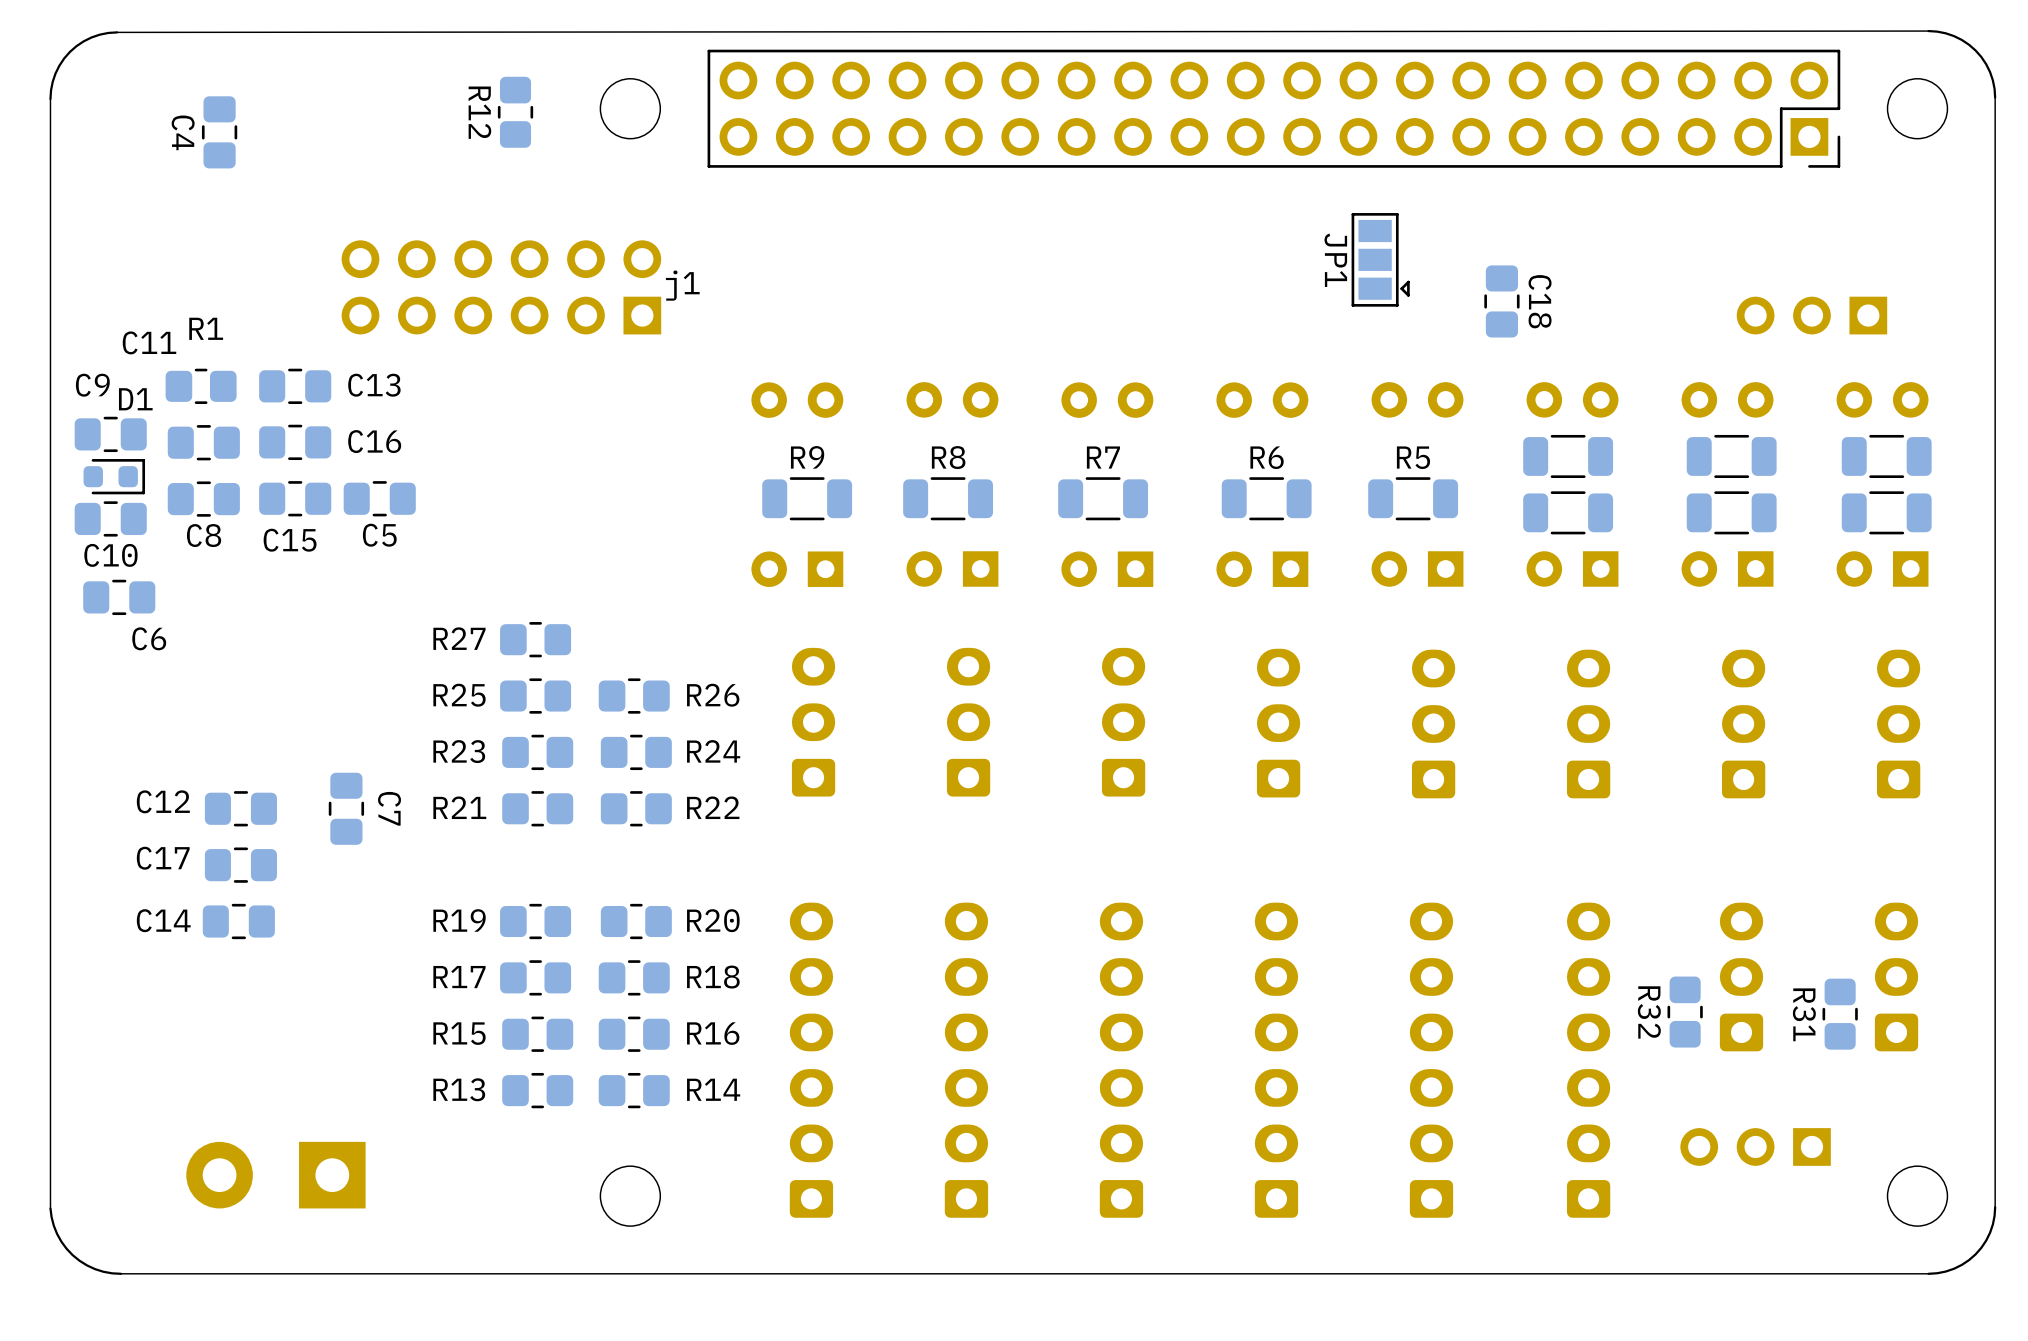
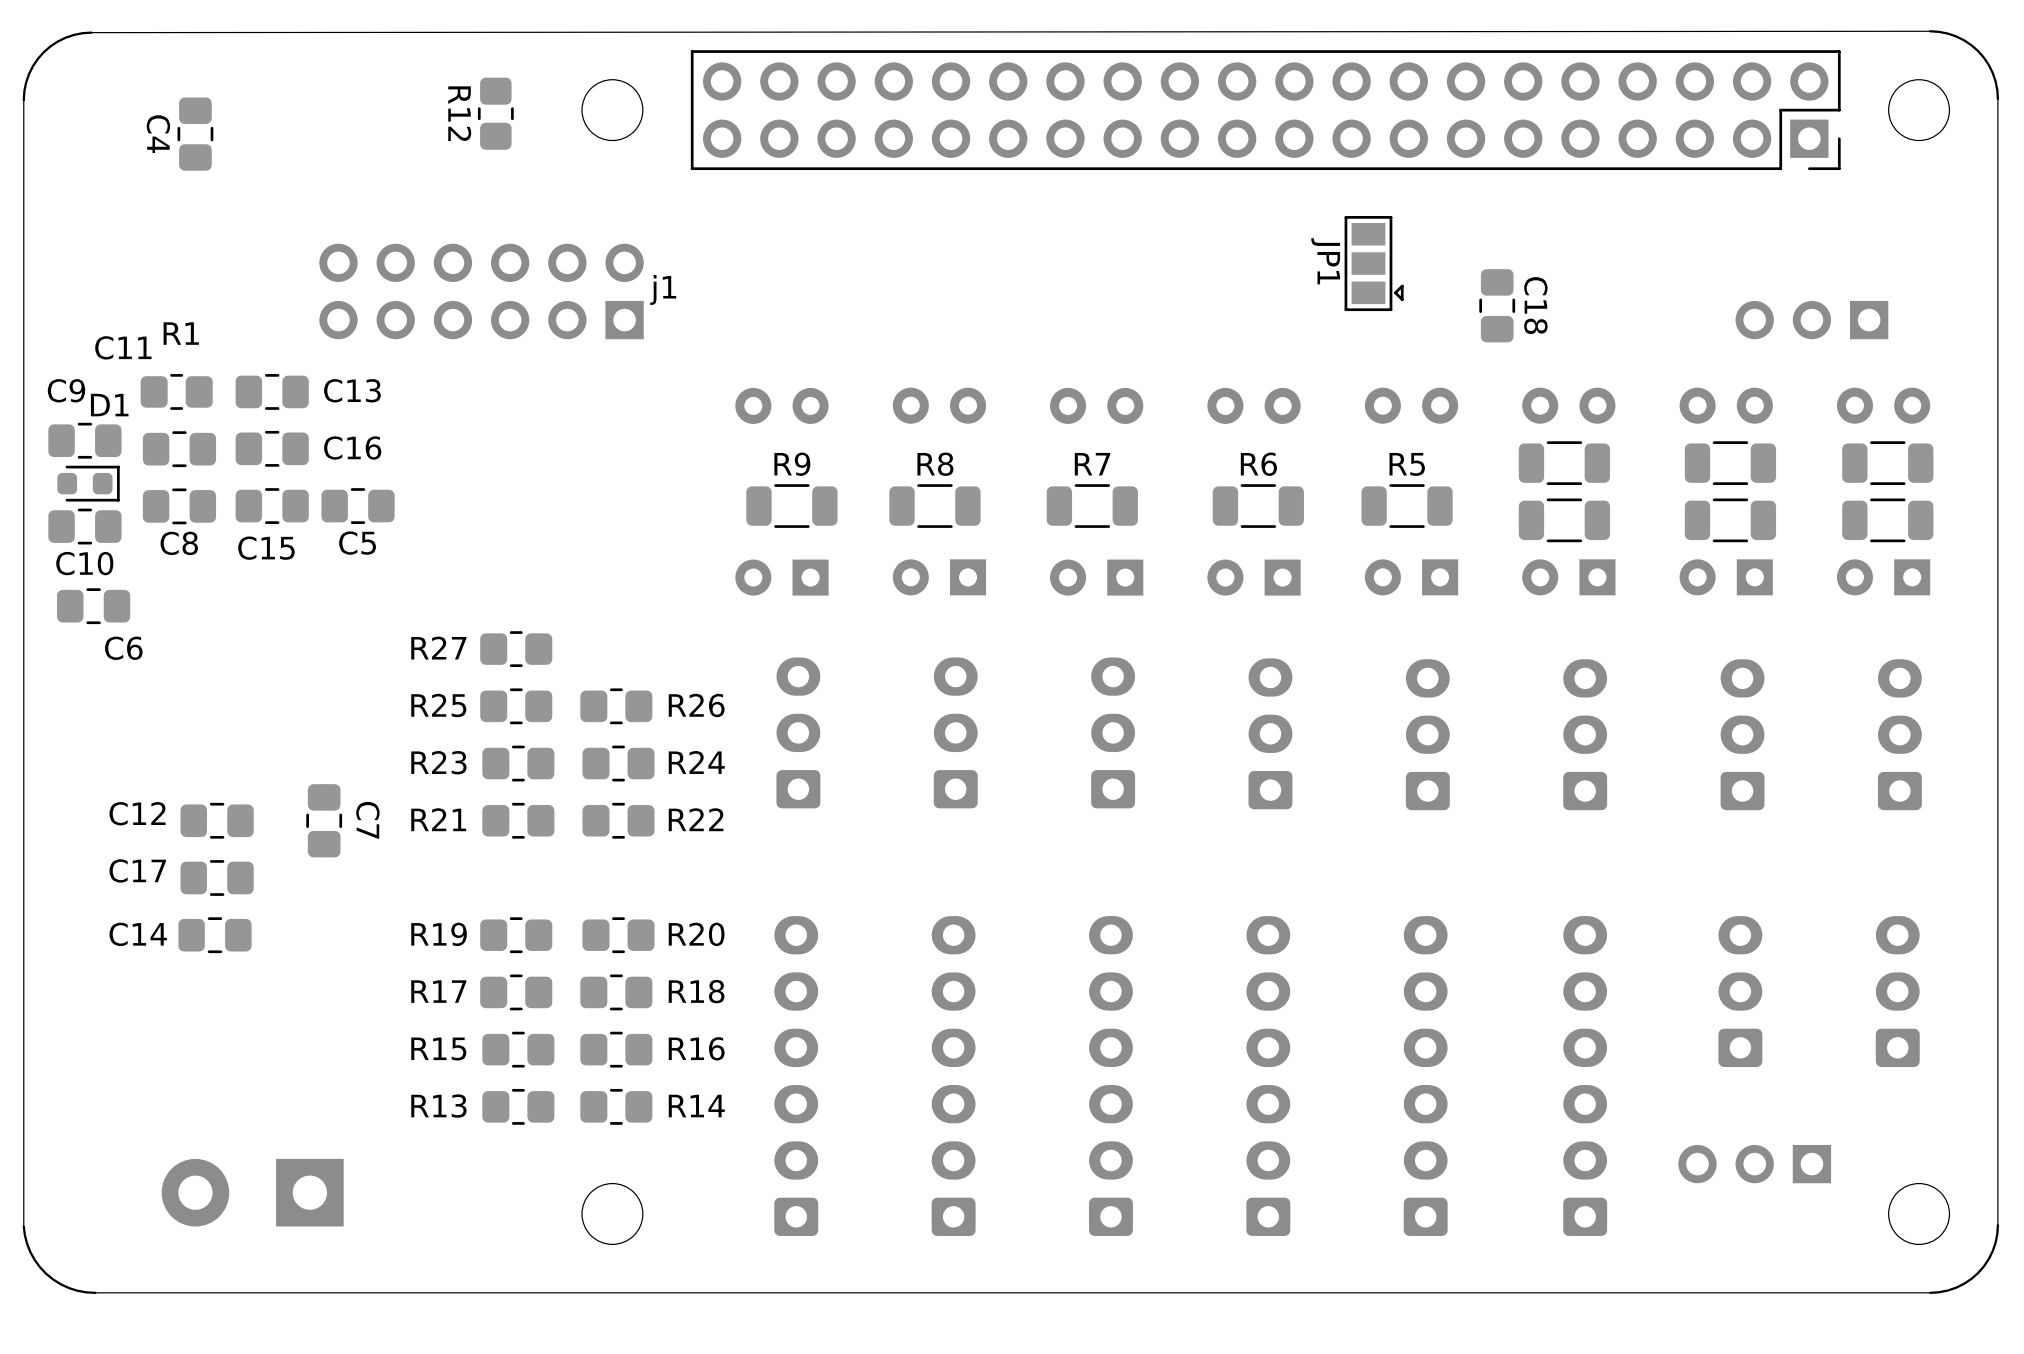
R32: (1685, 1012) -> none
R31: (1840, 1014) -> none

